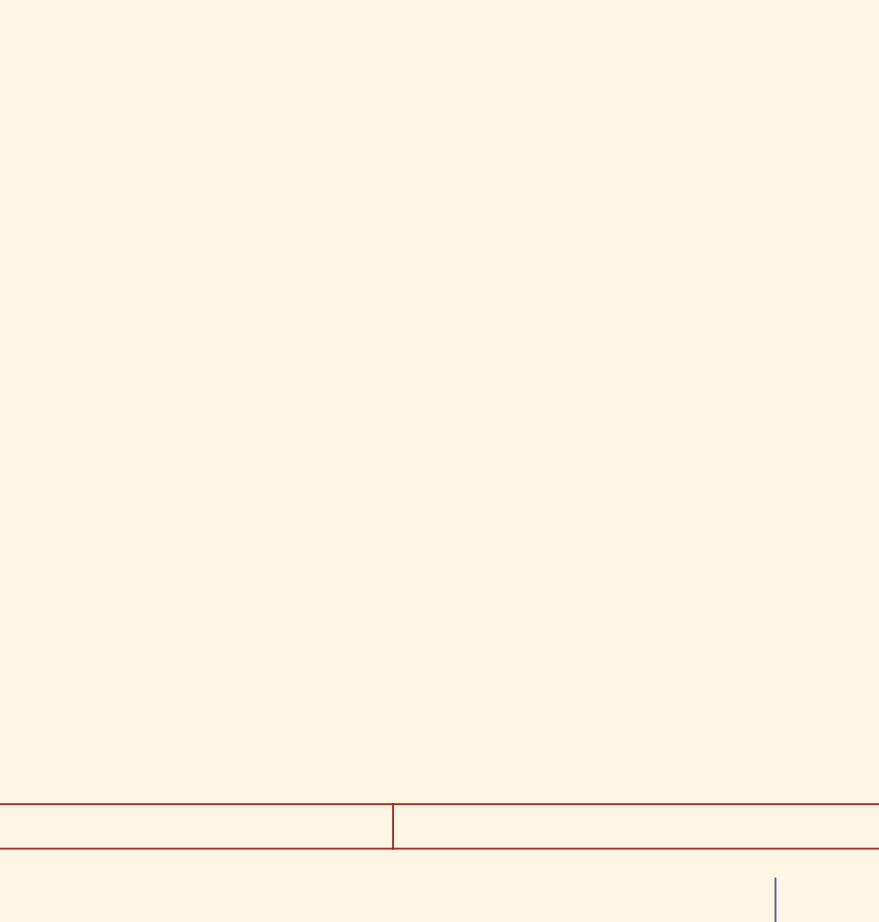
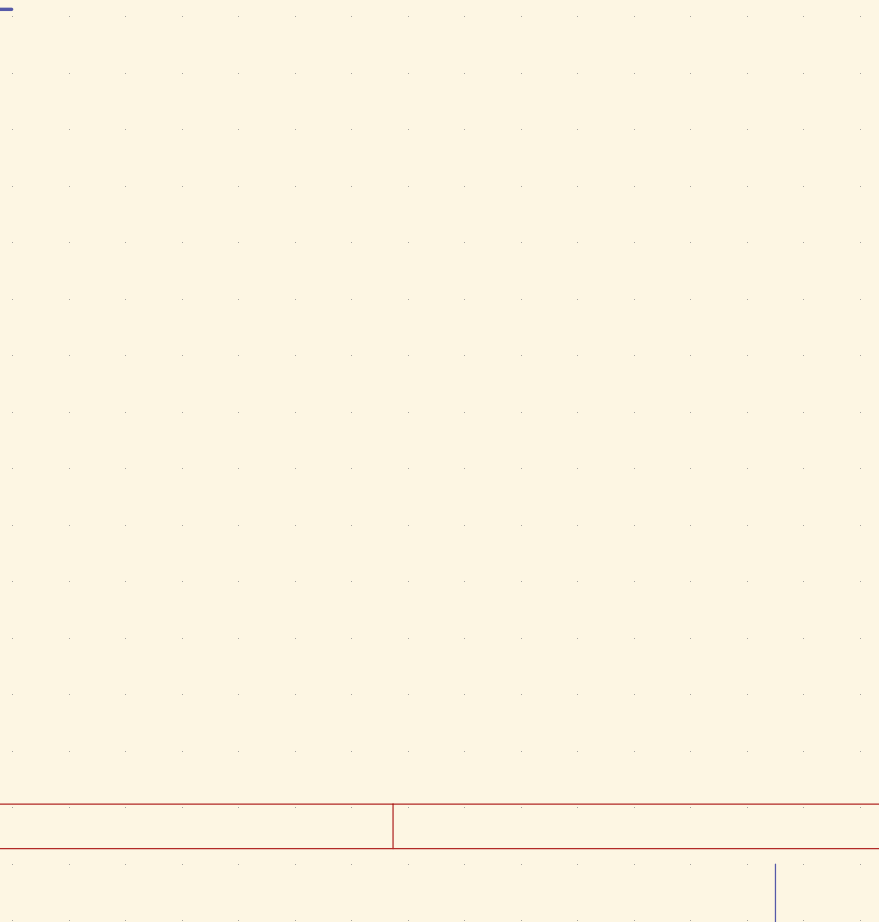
line: none -> (775, 864) (775, 878)

